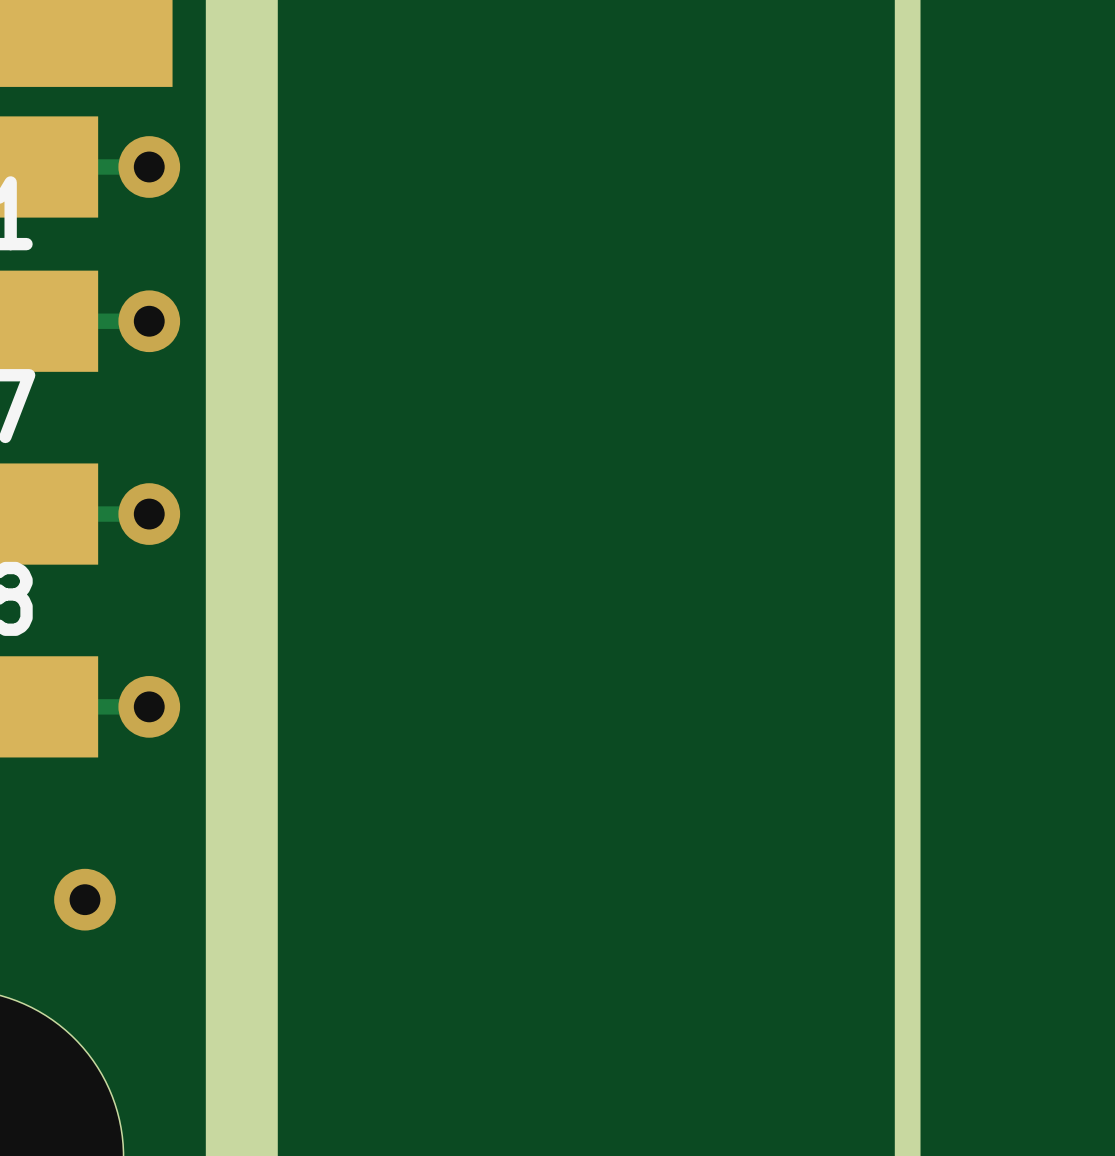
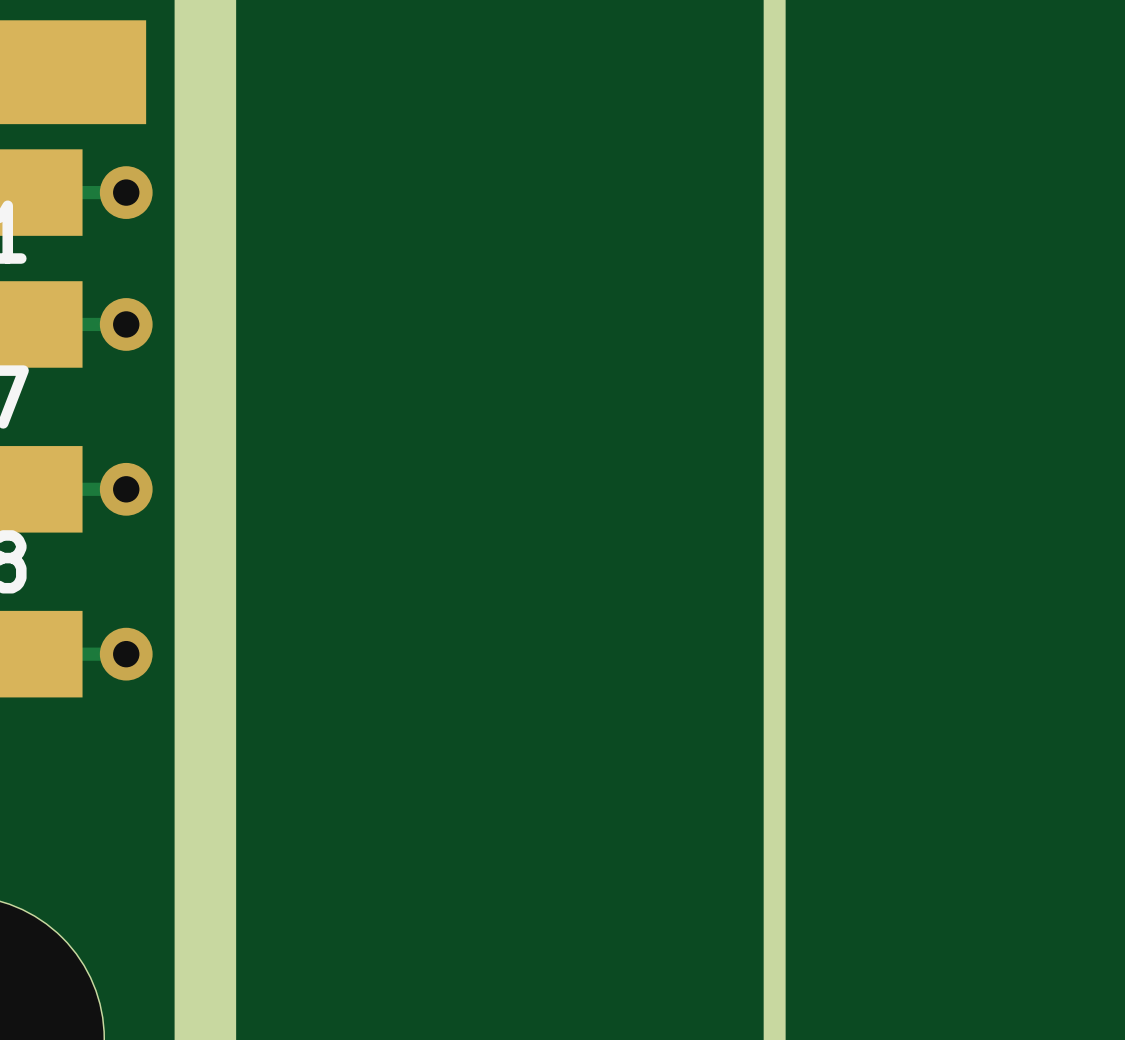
via: (84, 899) -> none

